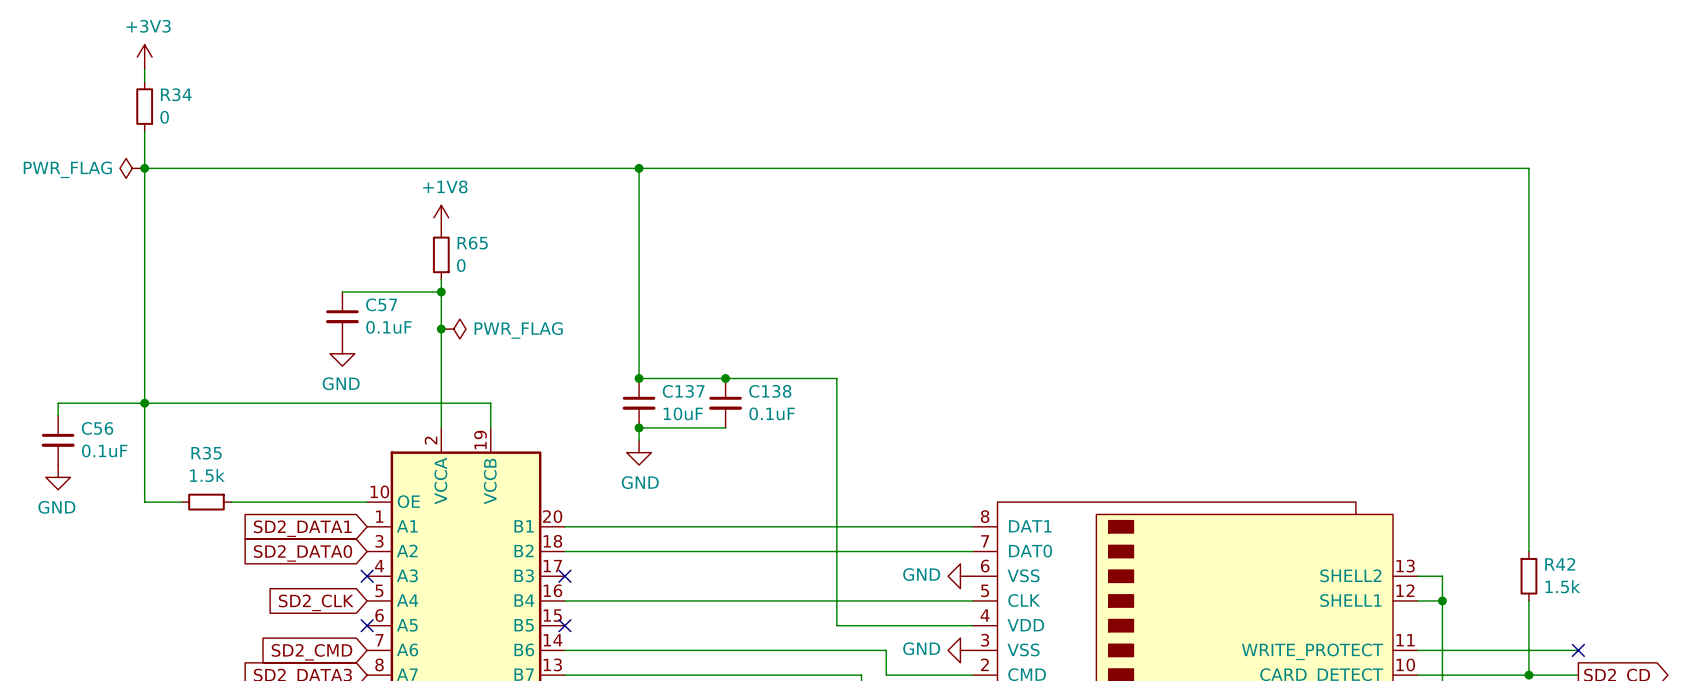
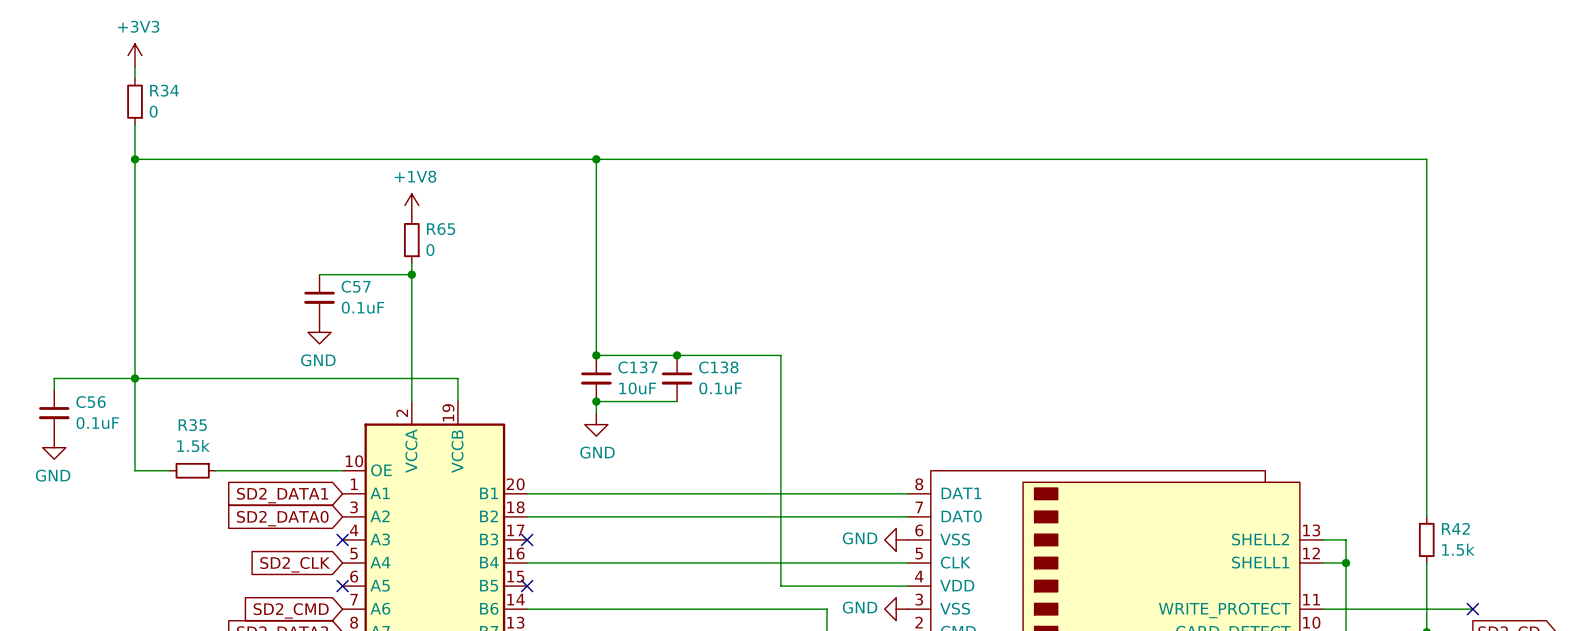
power symbol: PWR_FLAG (132, 168) -> none
junction: (441, 329) -> none
power symbol: PWR_FLAG (453, 329) -> none

